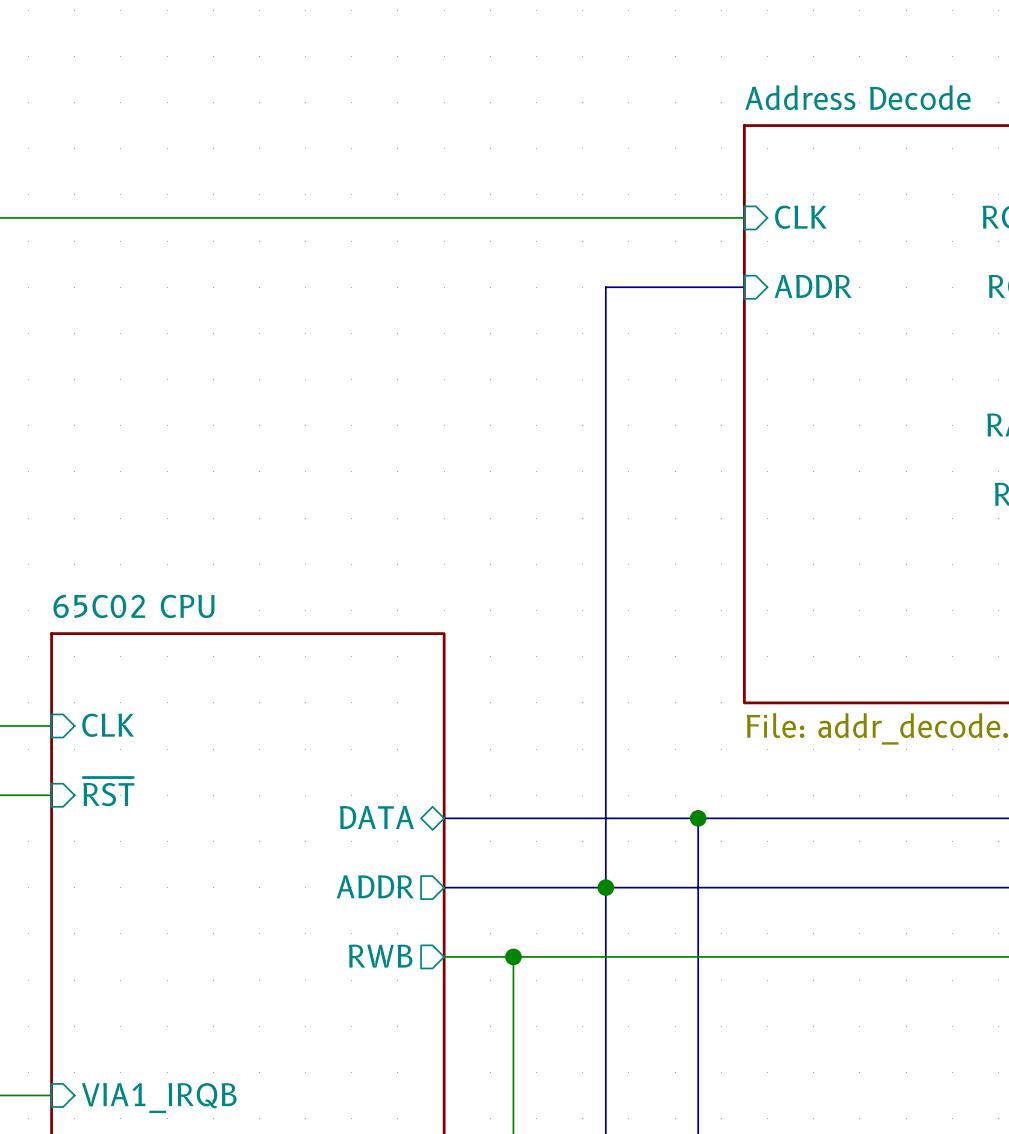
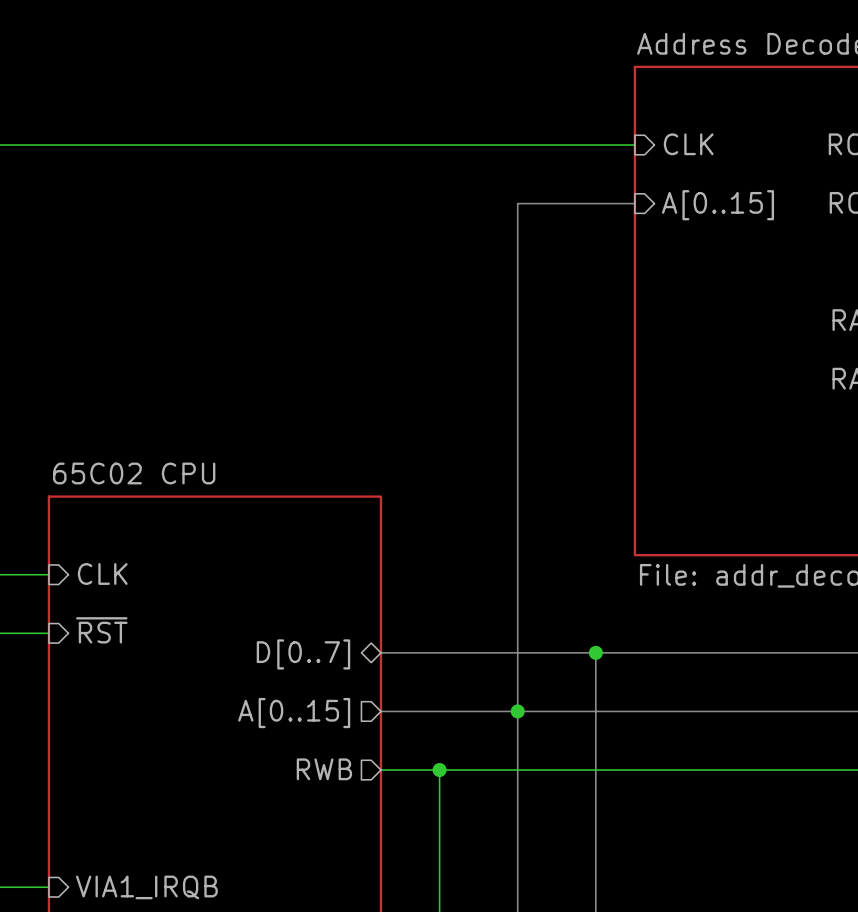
sheet pin: ADDR (813, 286) -> A[0..15] (717, 205)
sheet pin: DATA (376, 817) -> D[0..7] (303, 654)
sheet pin: ADDR (375, 886) -> A[0..15] (294, 713)

